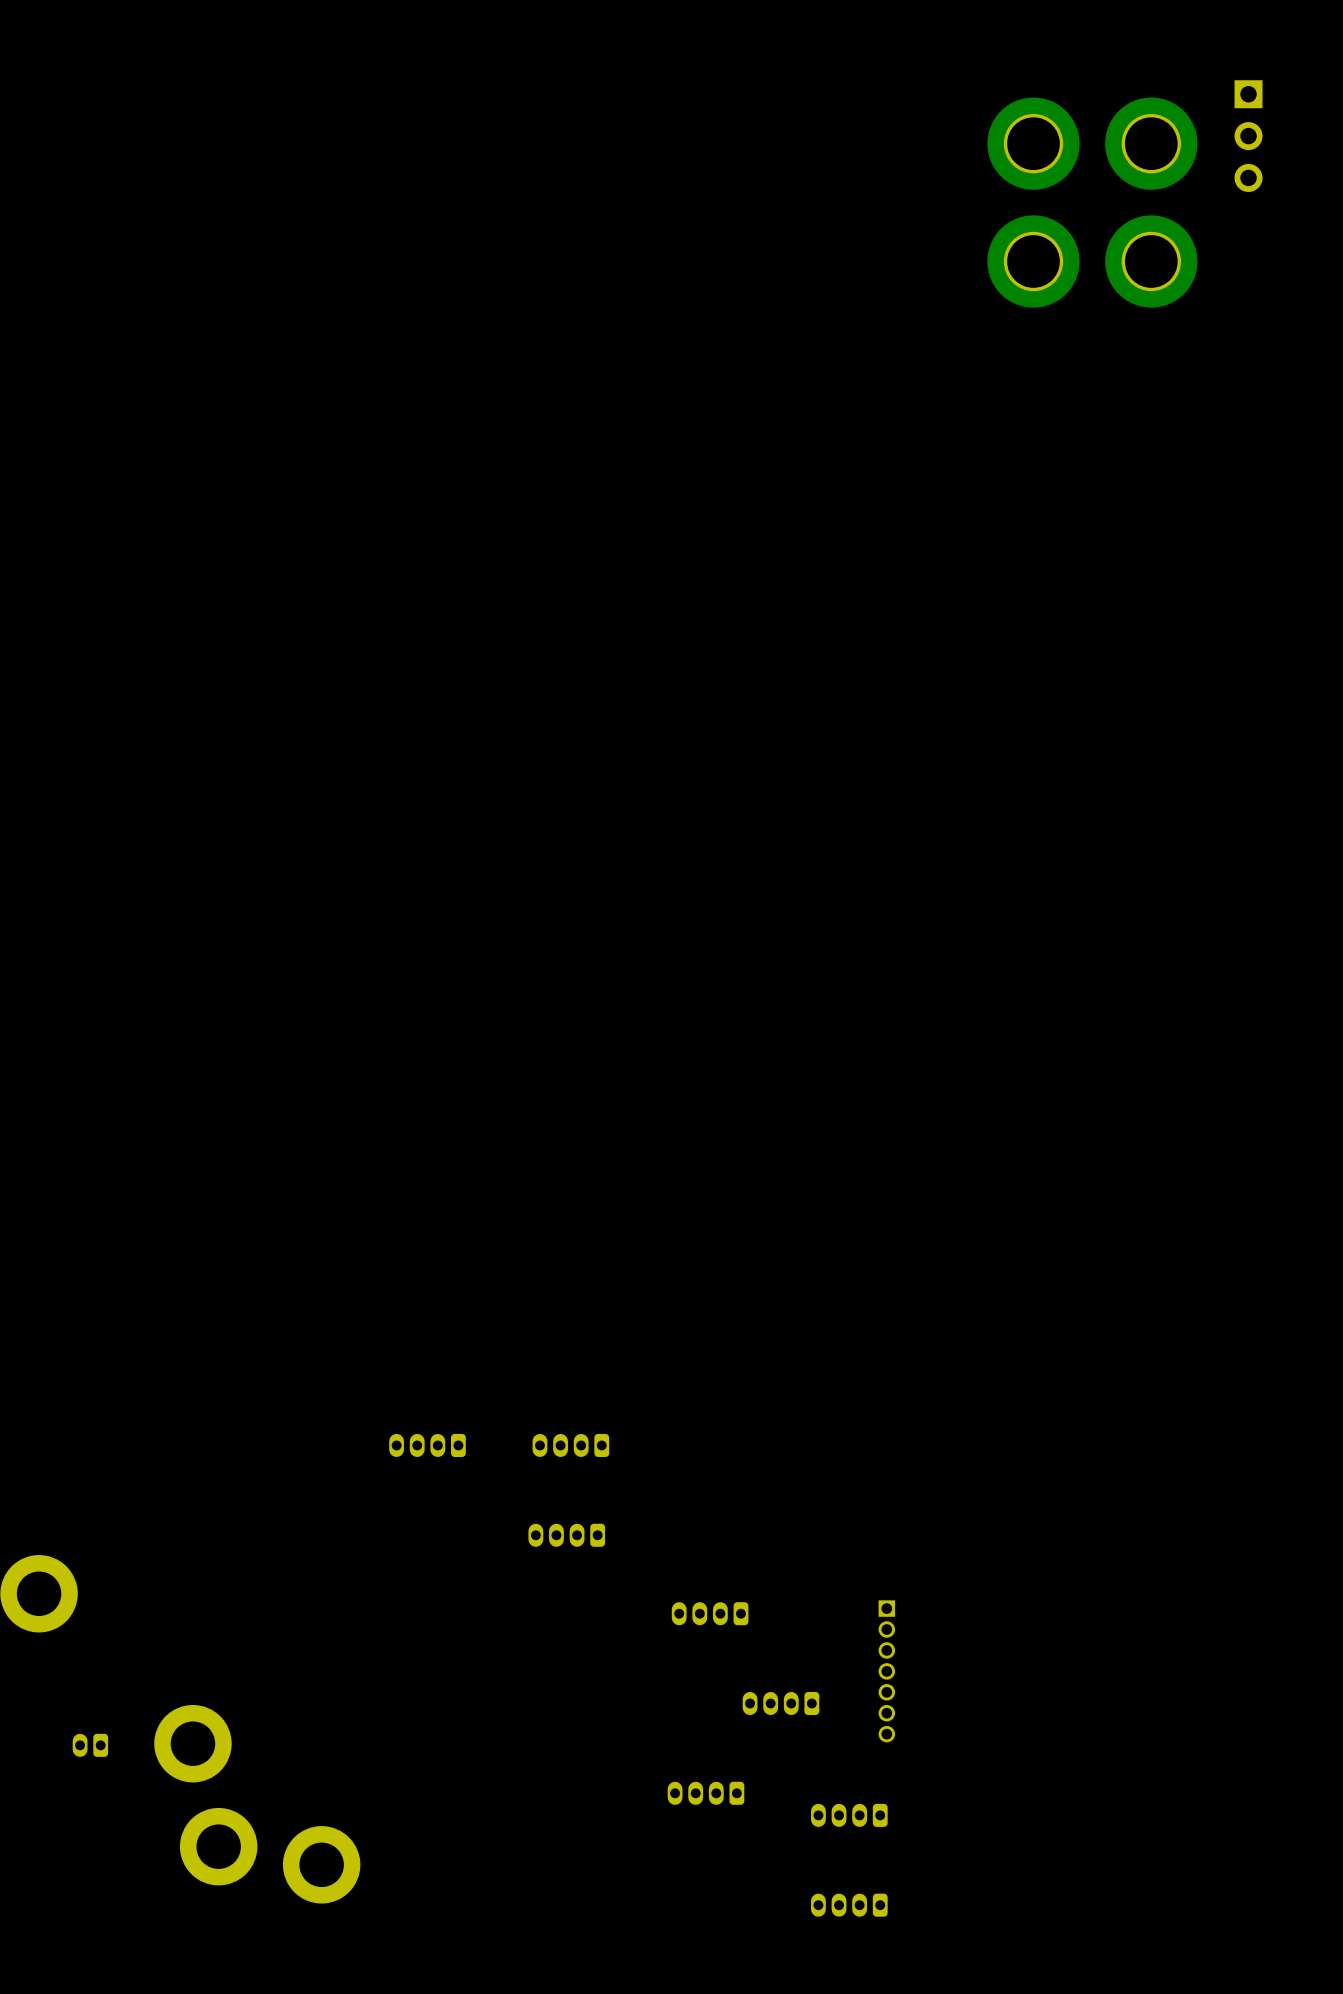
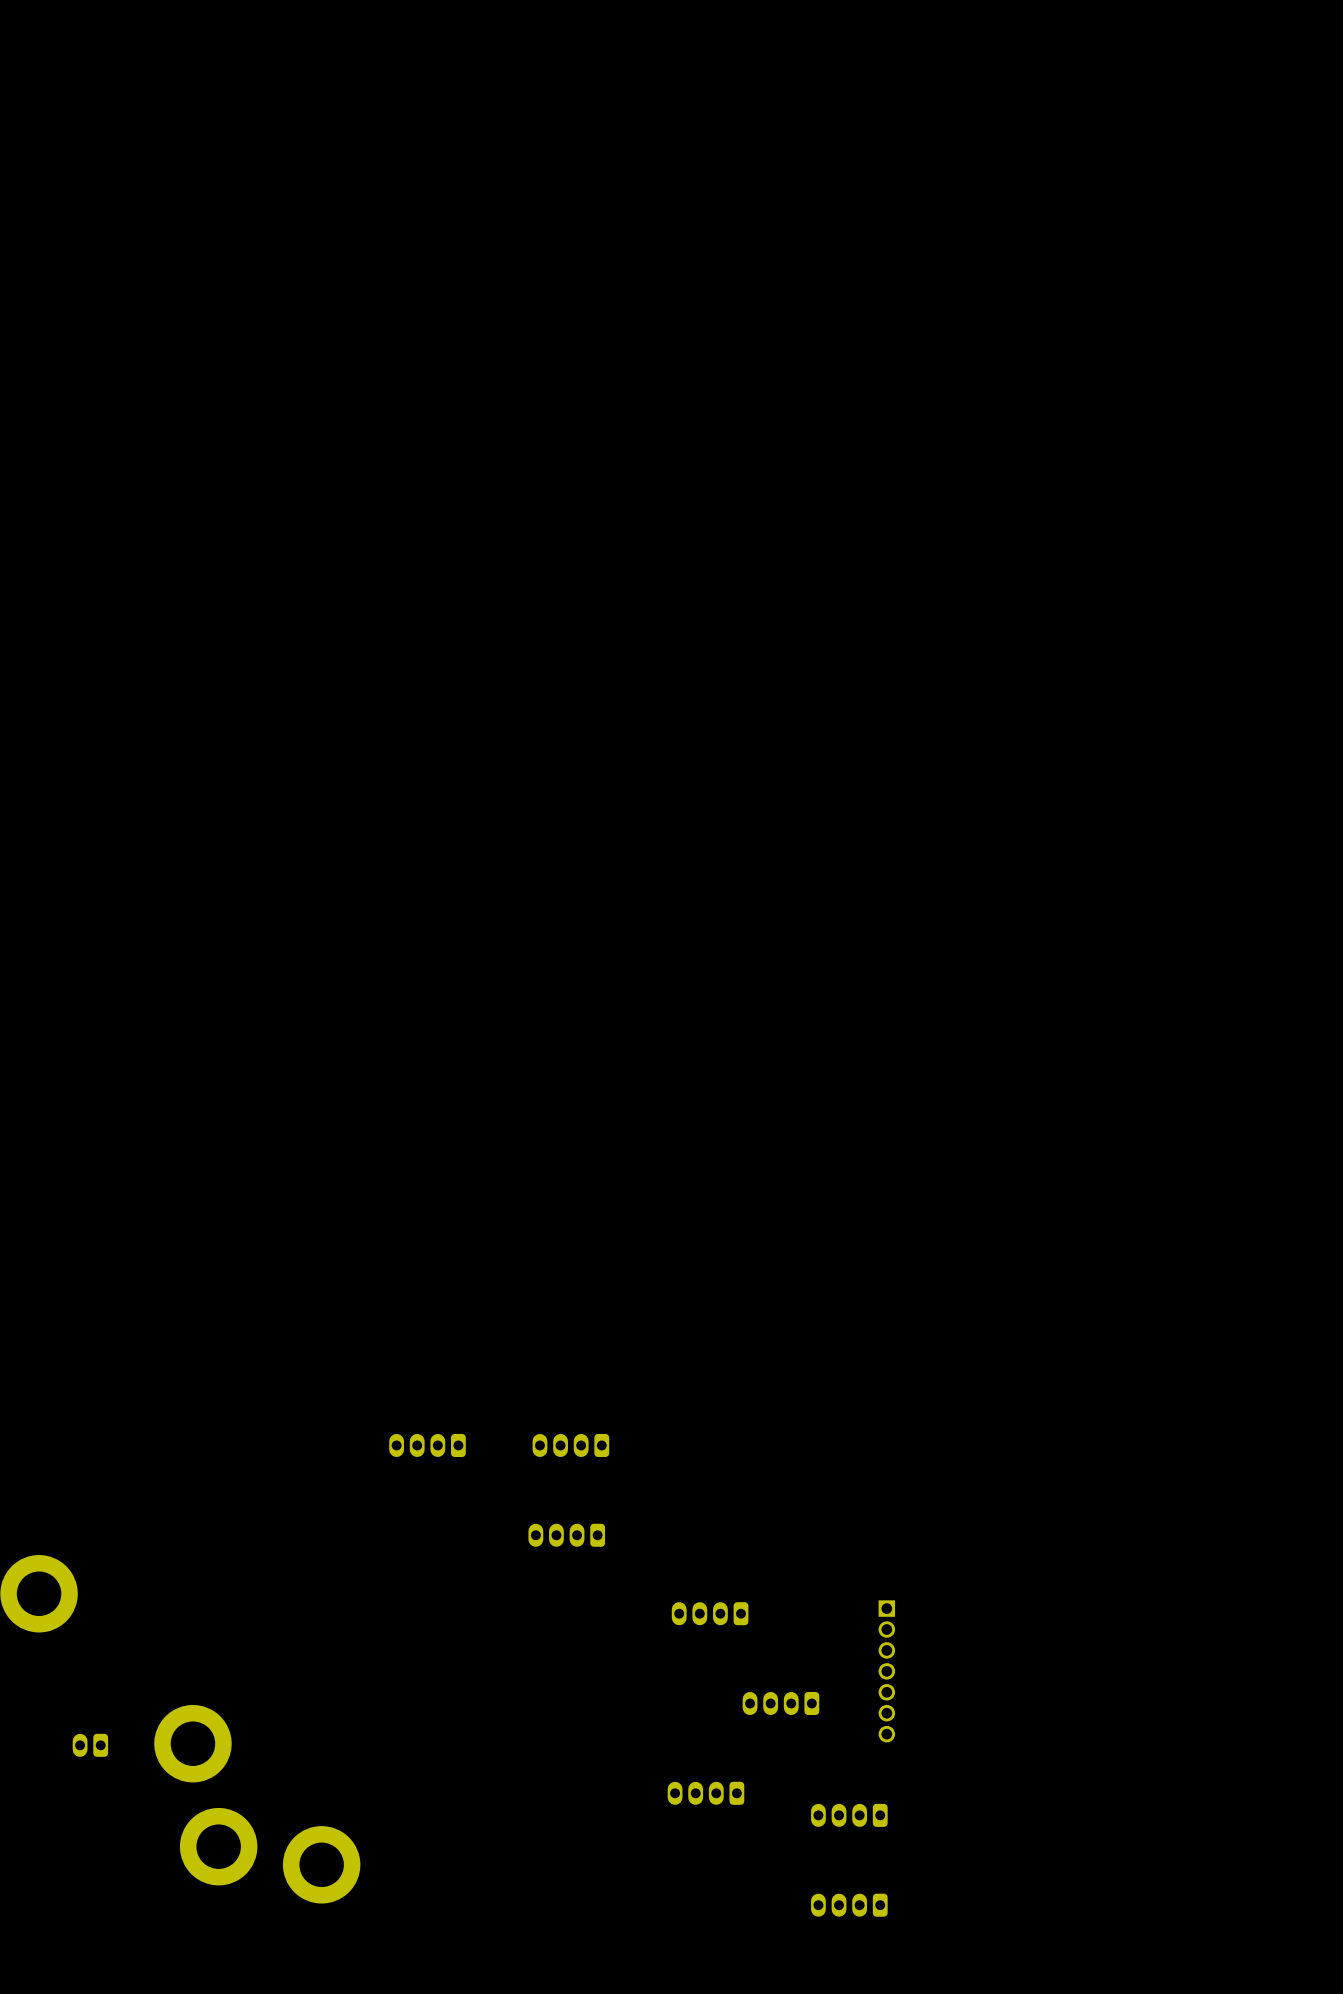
part: (1248, 136) -> none
part: (1033, 143) -> none
part: (1151, 143) -> none
part: (1033, 261) -> none
part: (1151, 261) -> none

